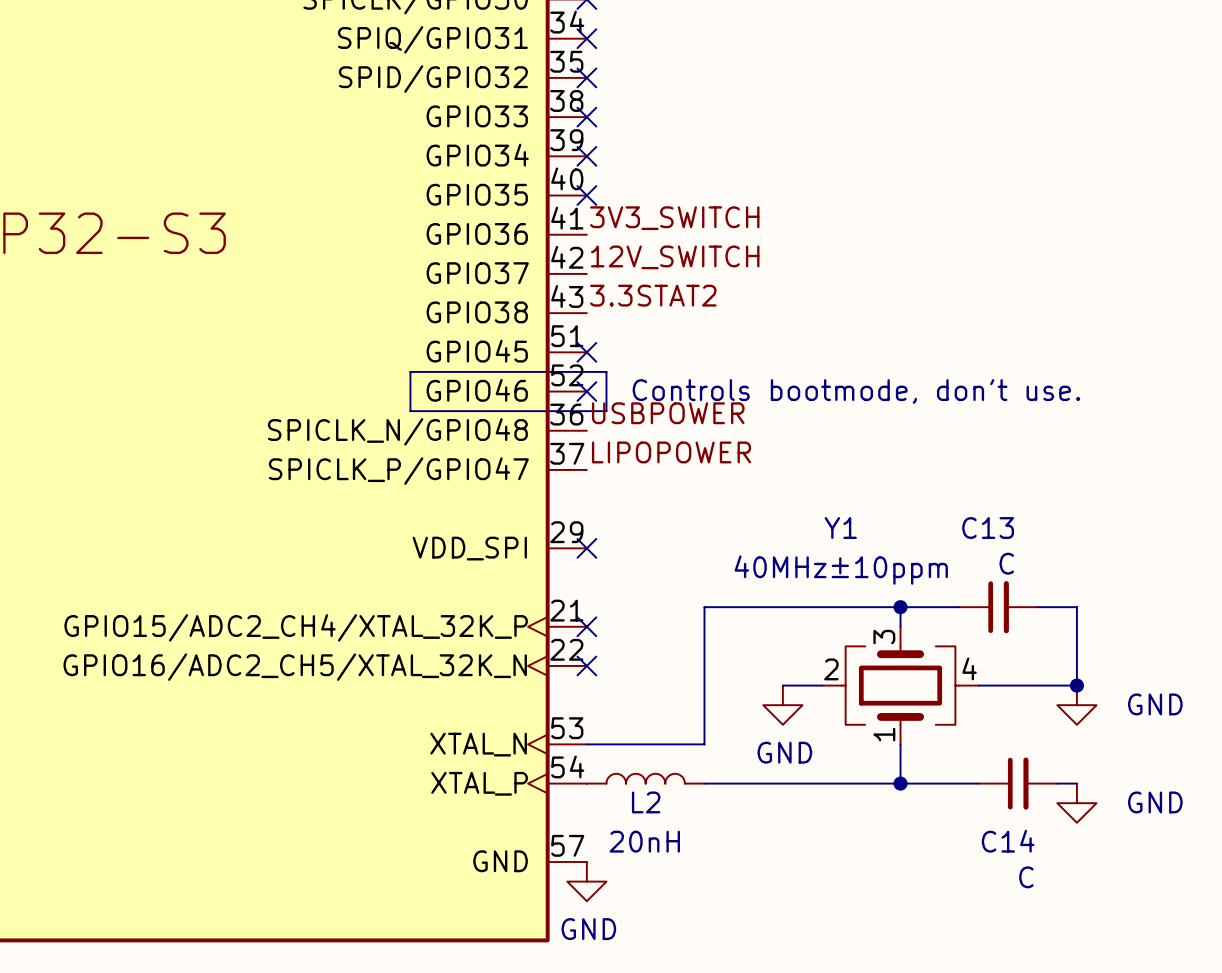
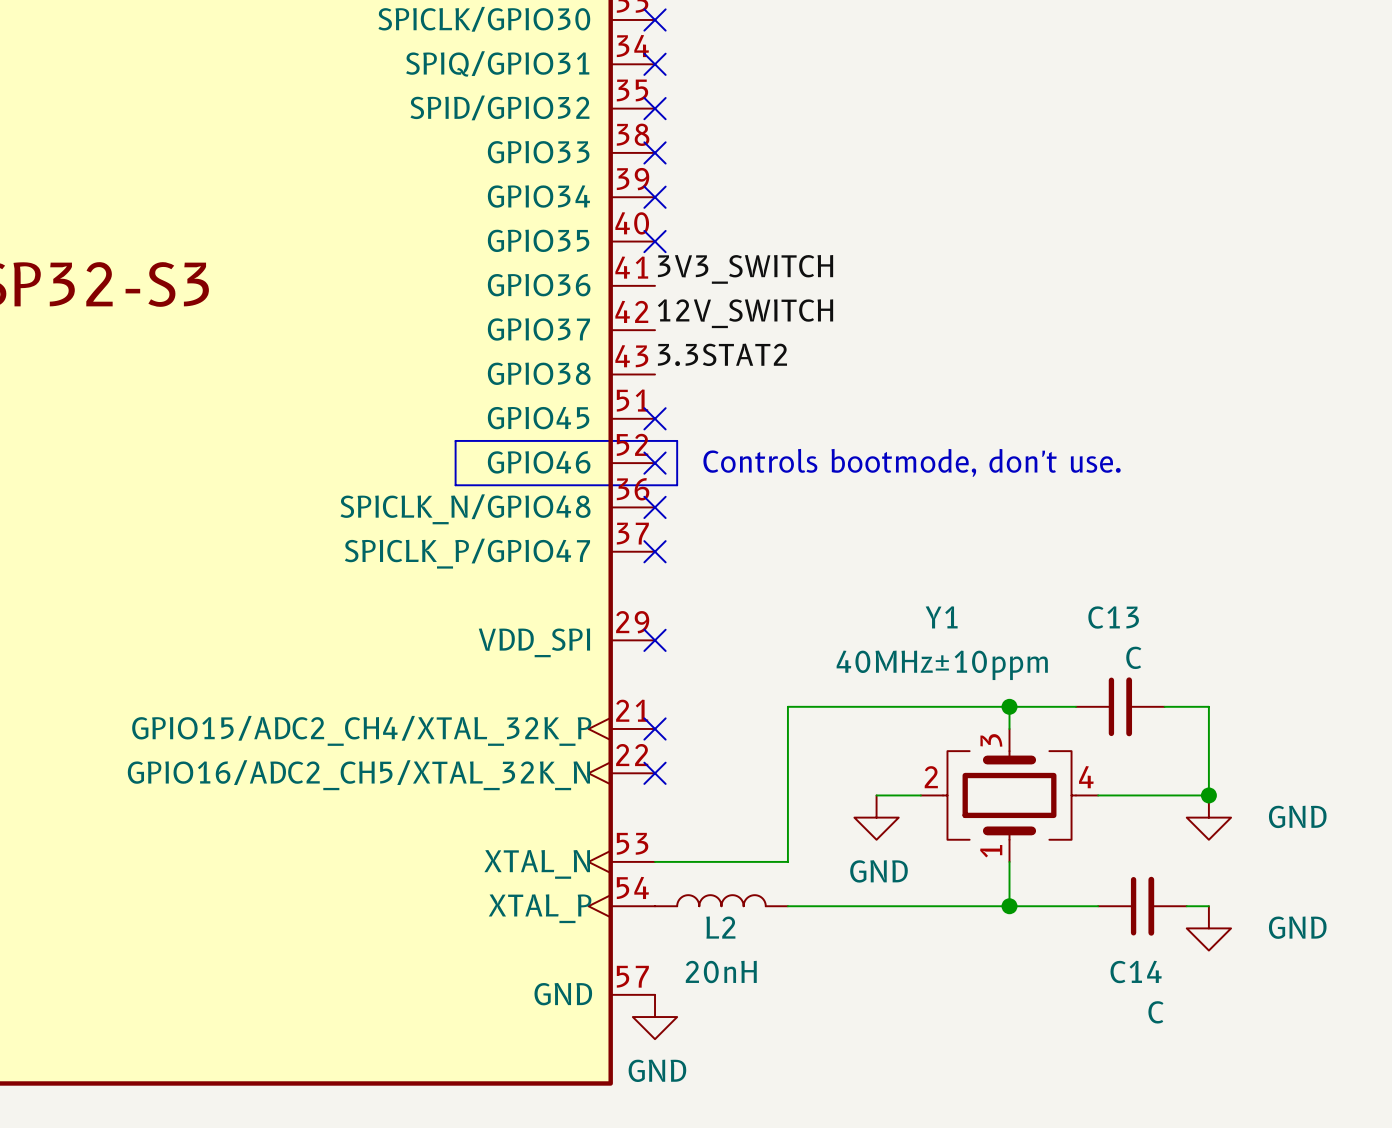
label: USBPOWER (668, 413) -> none
no-connect mark: none -> (655, 507)
label: LIPOPOWER (671, 452) -> none
no-connect mark: none -> (655, 551)

